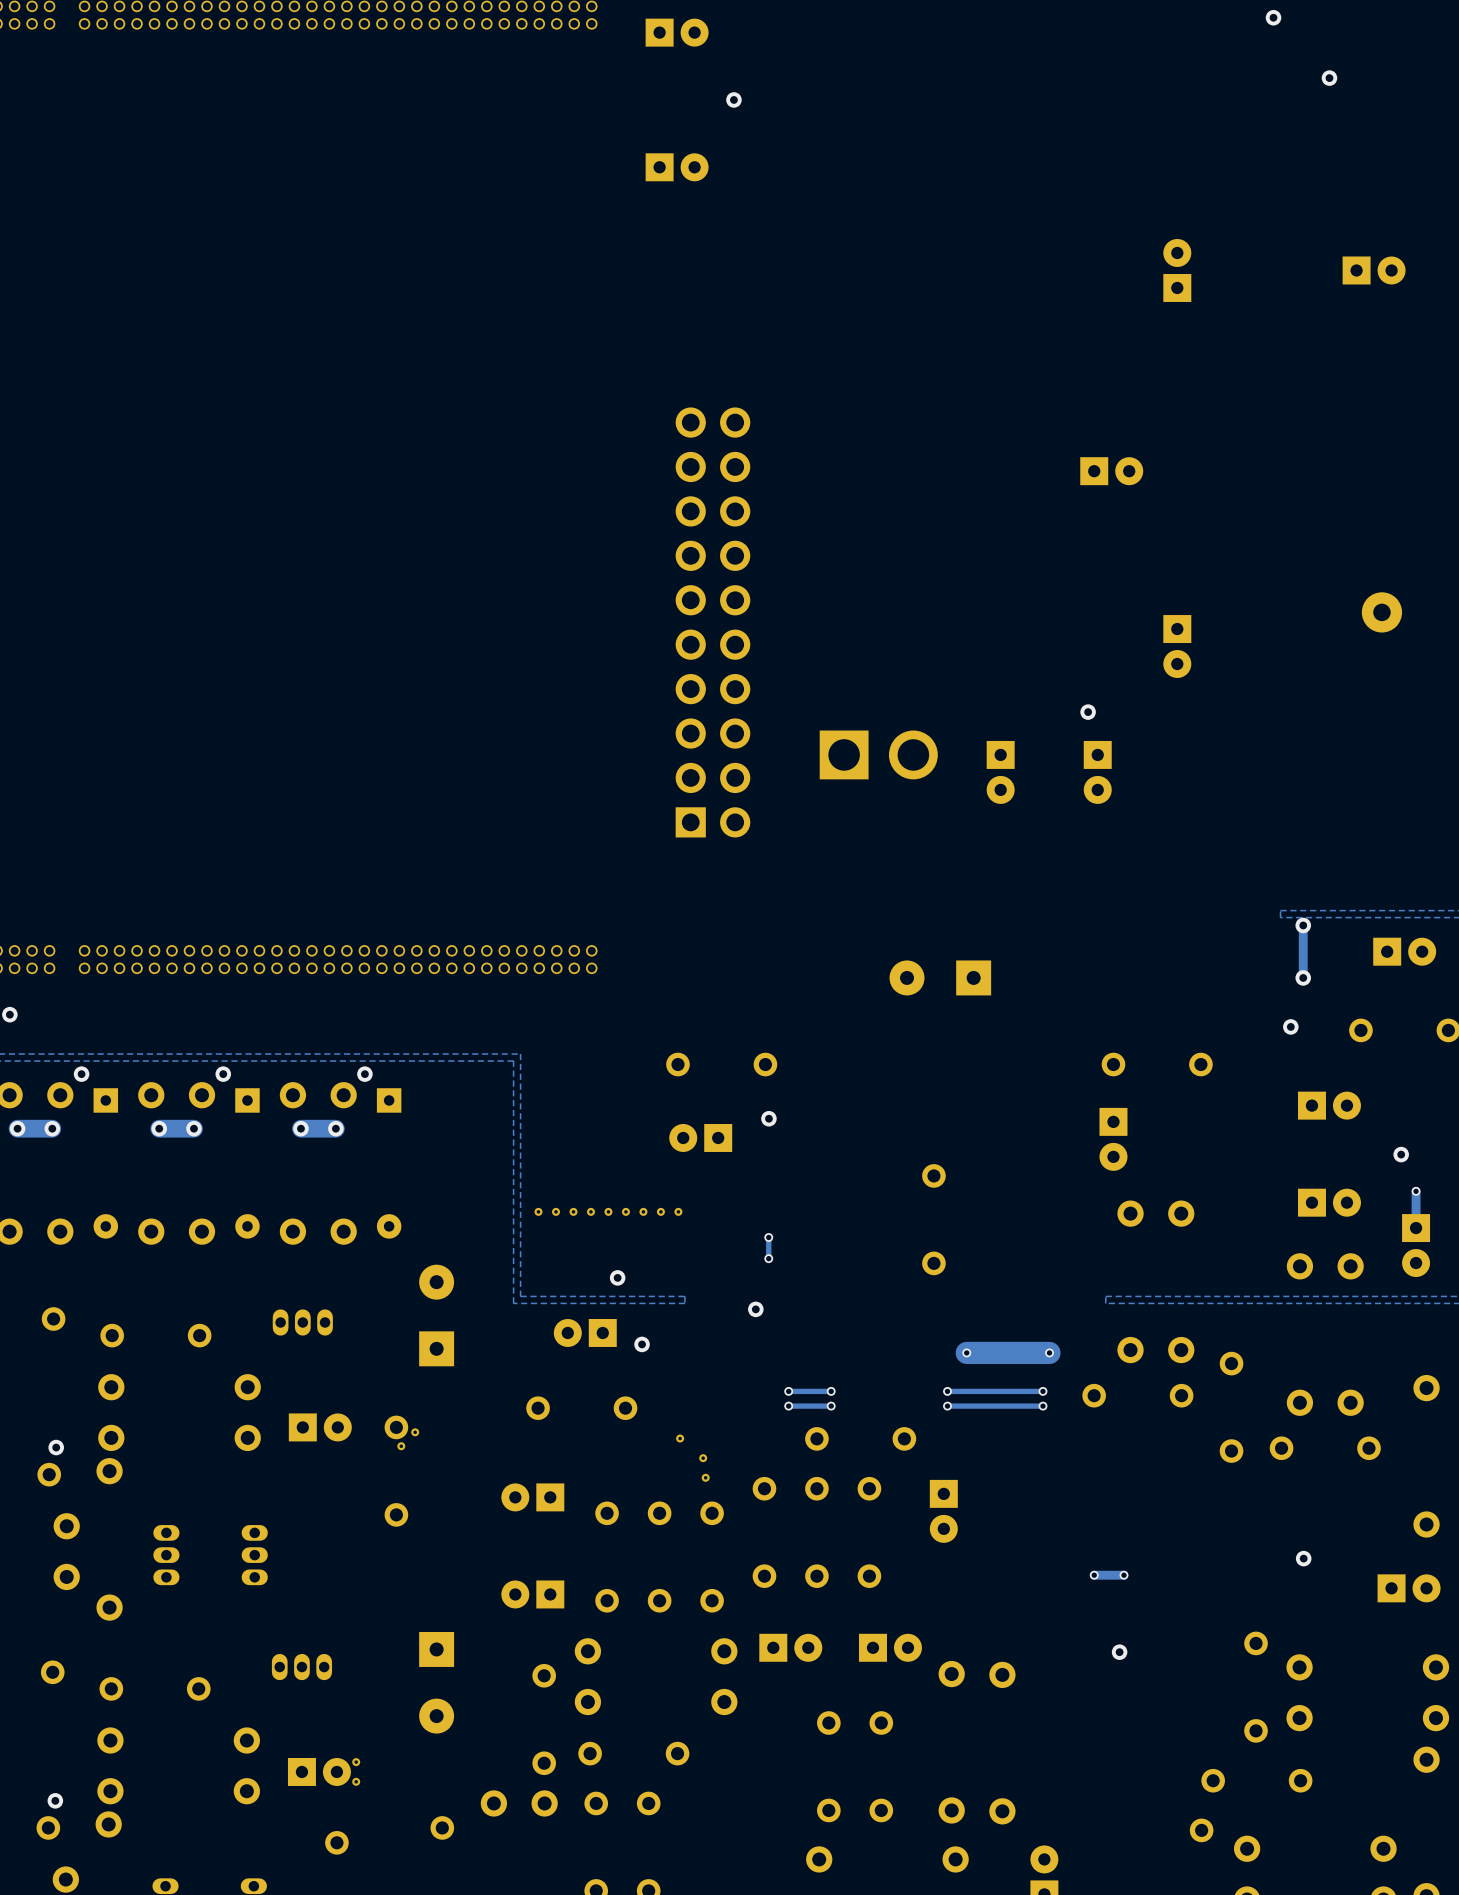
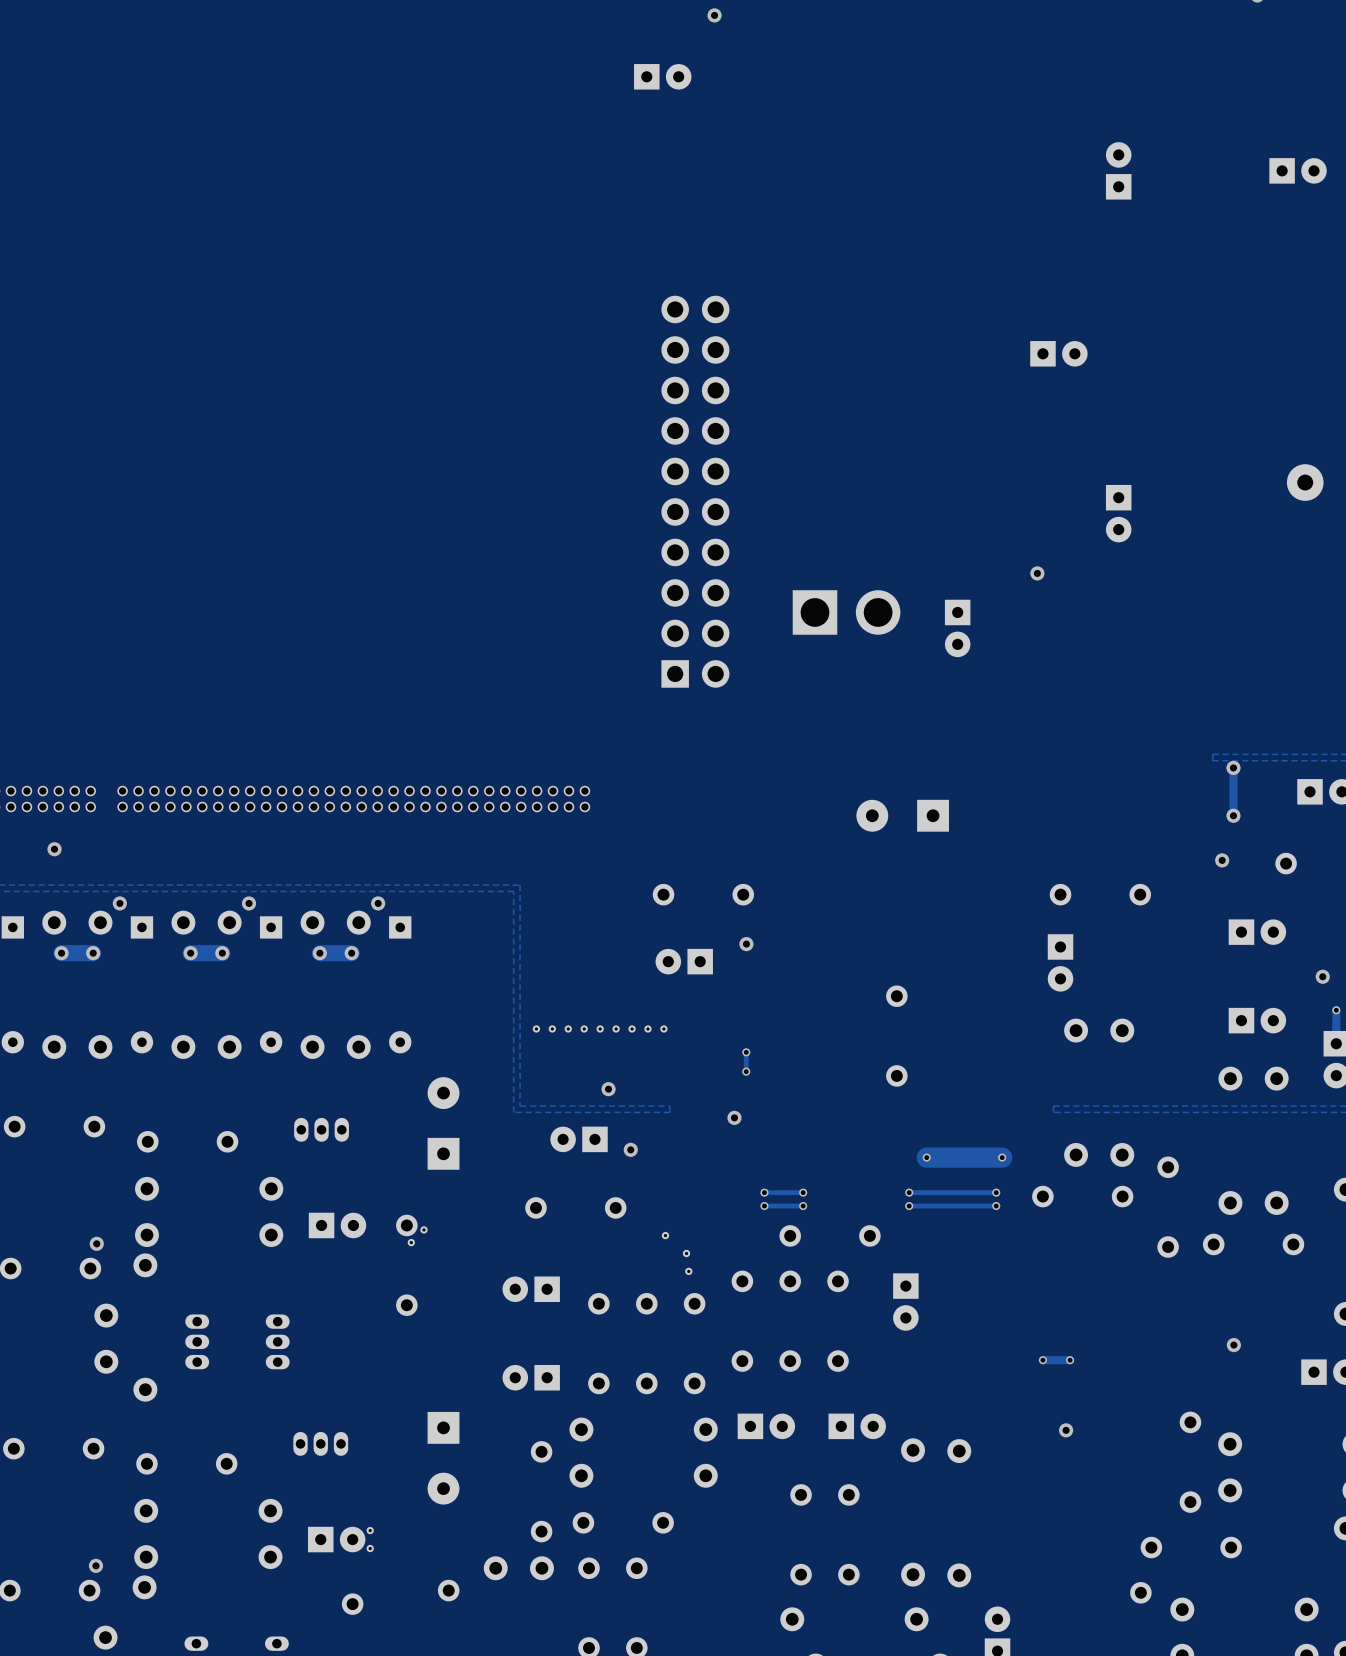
part: (1097, 772) -> none

